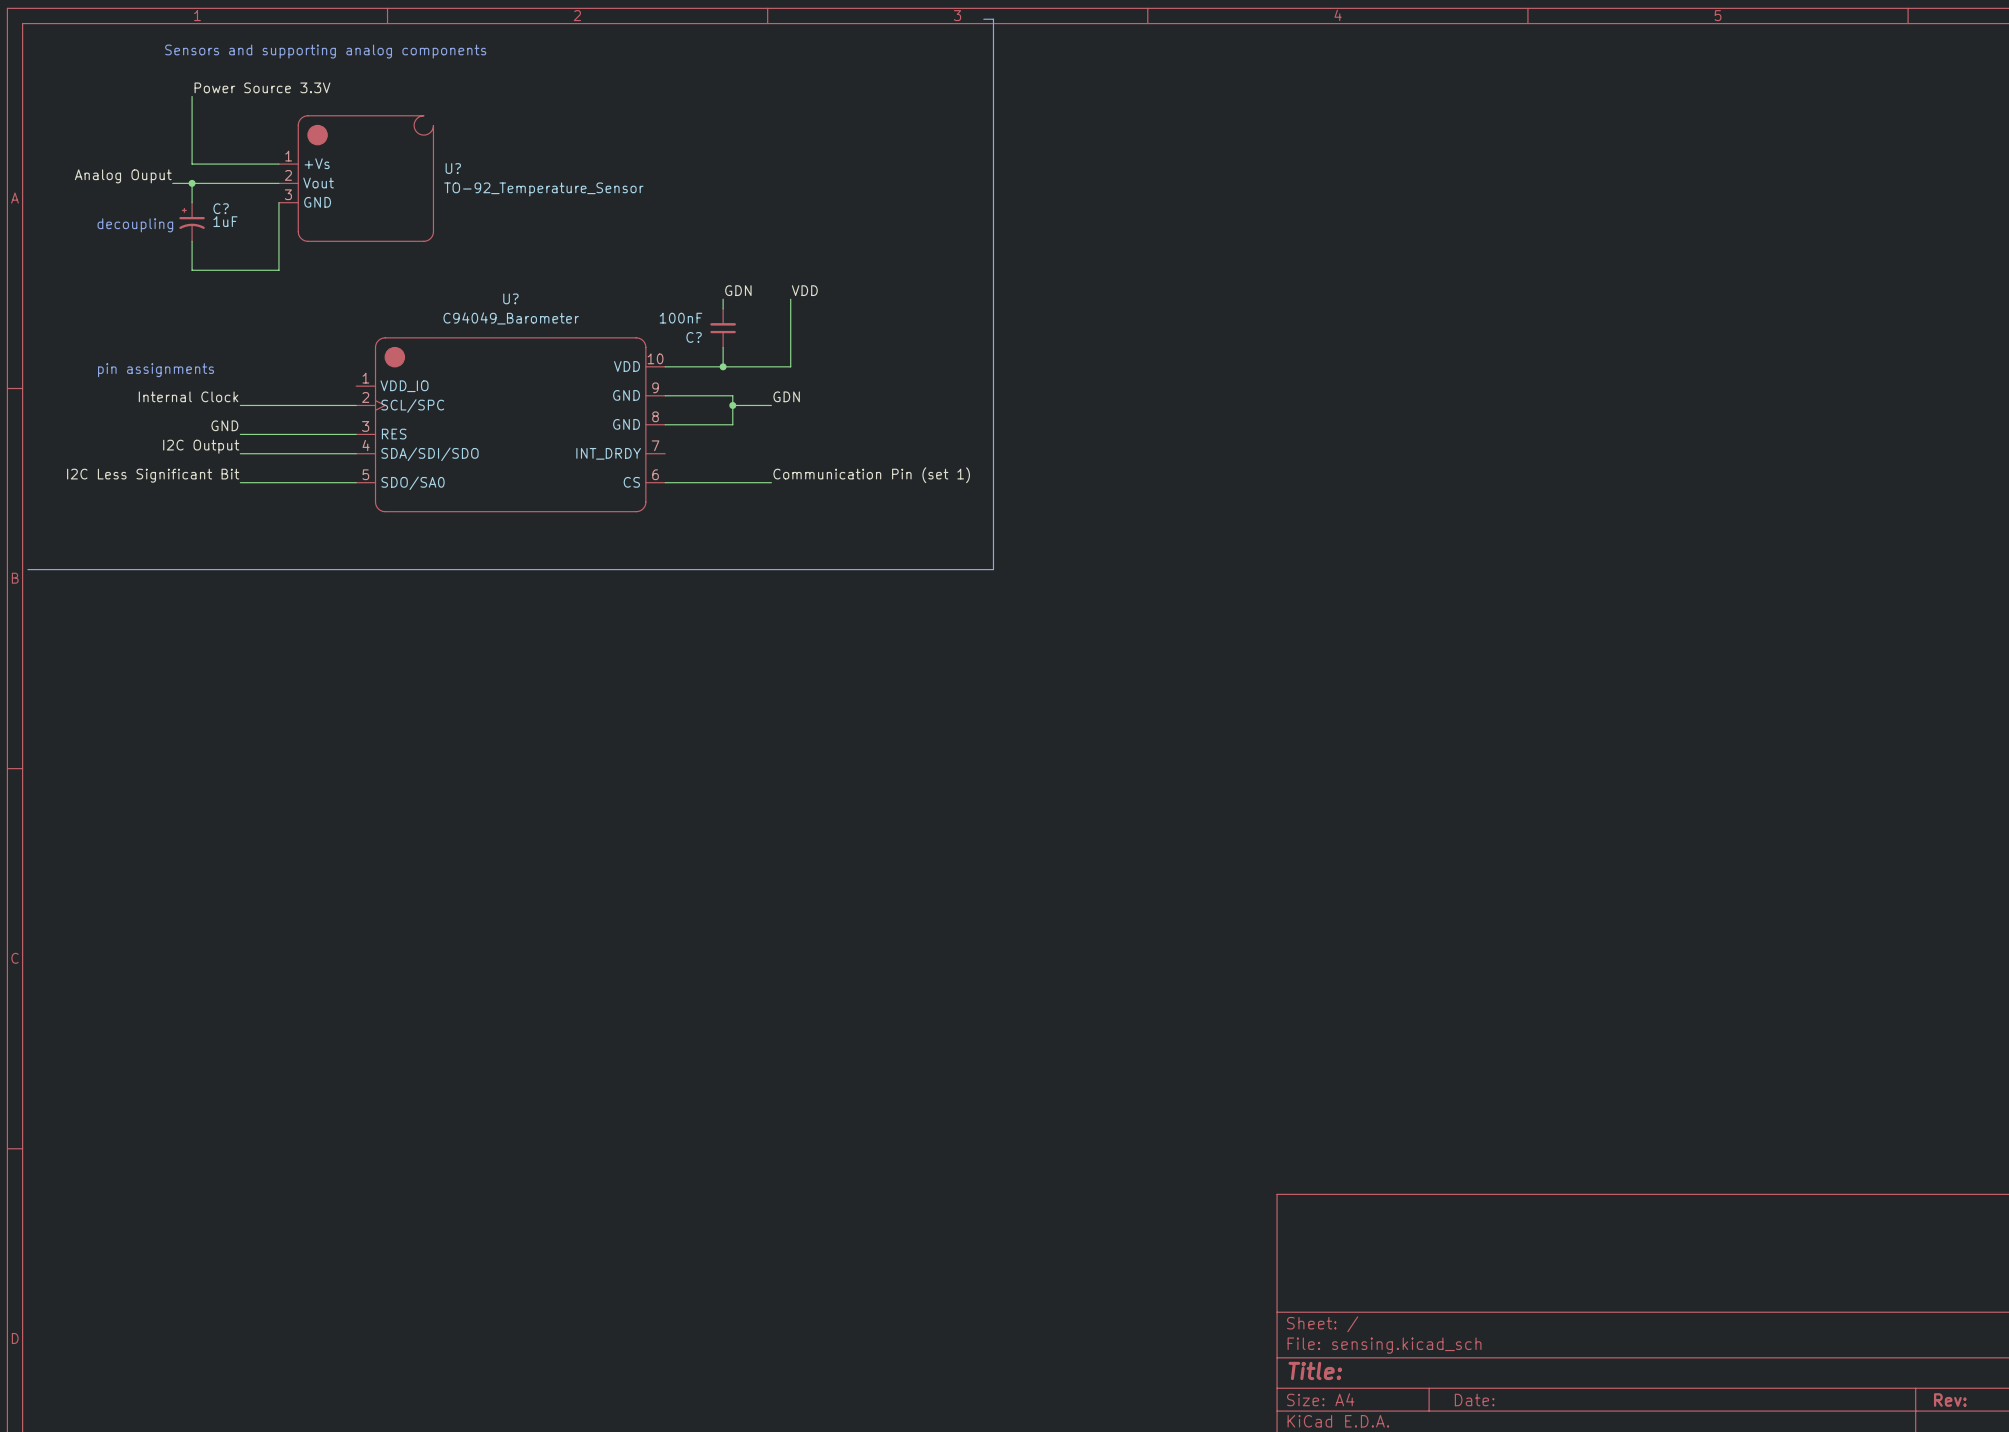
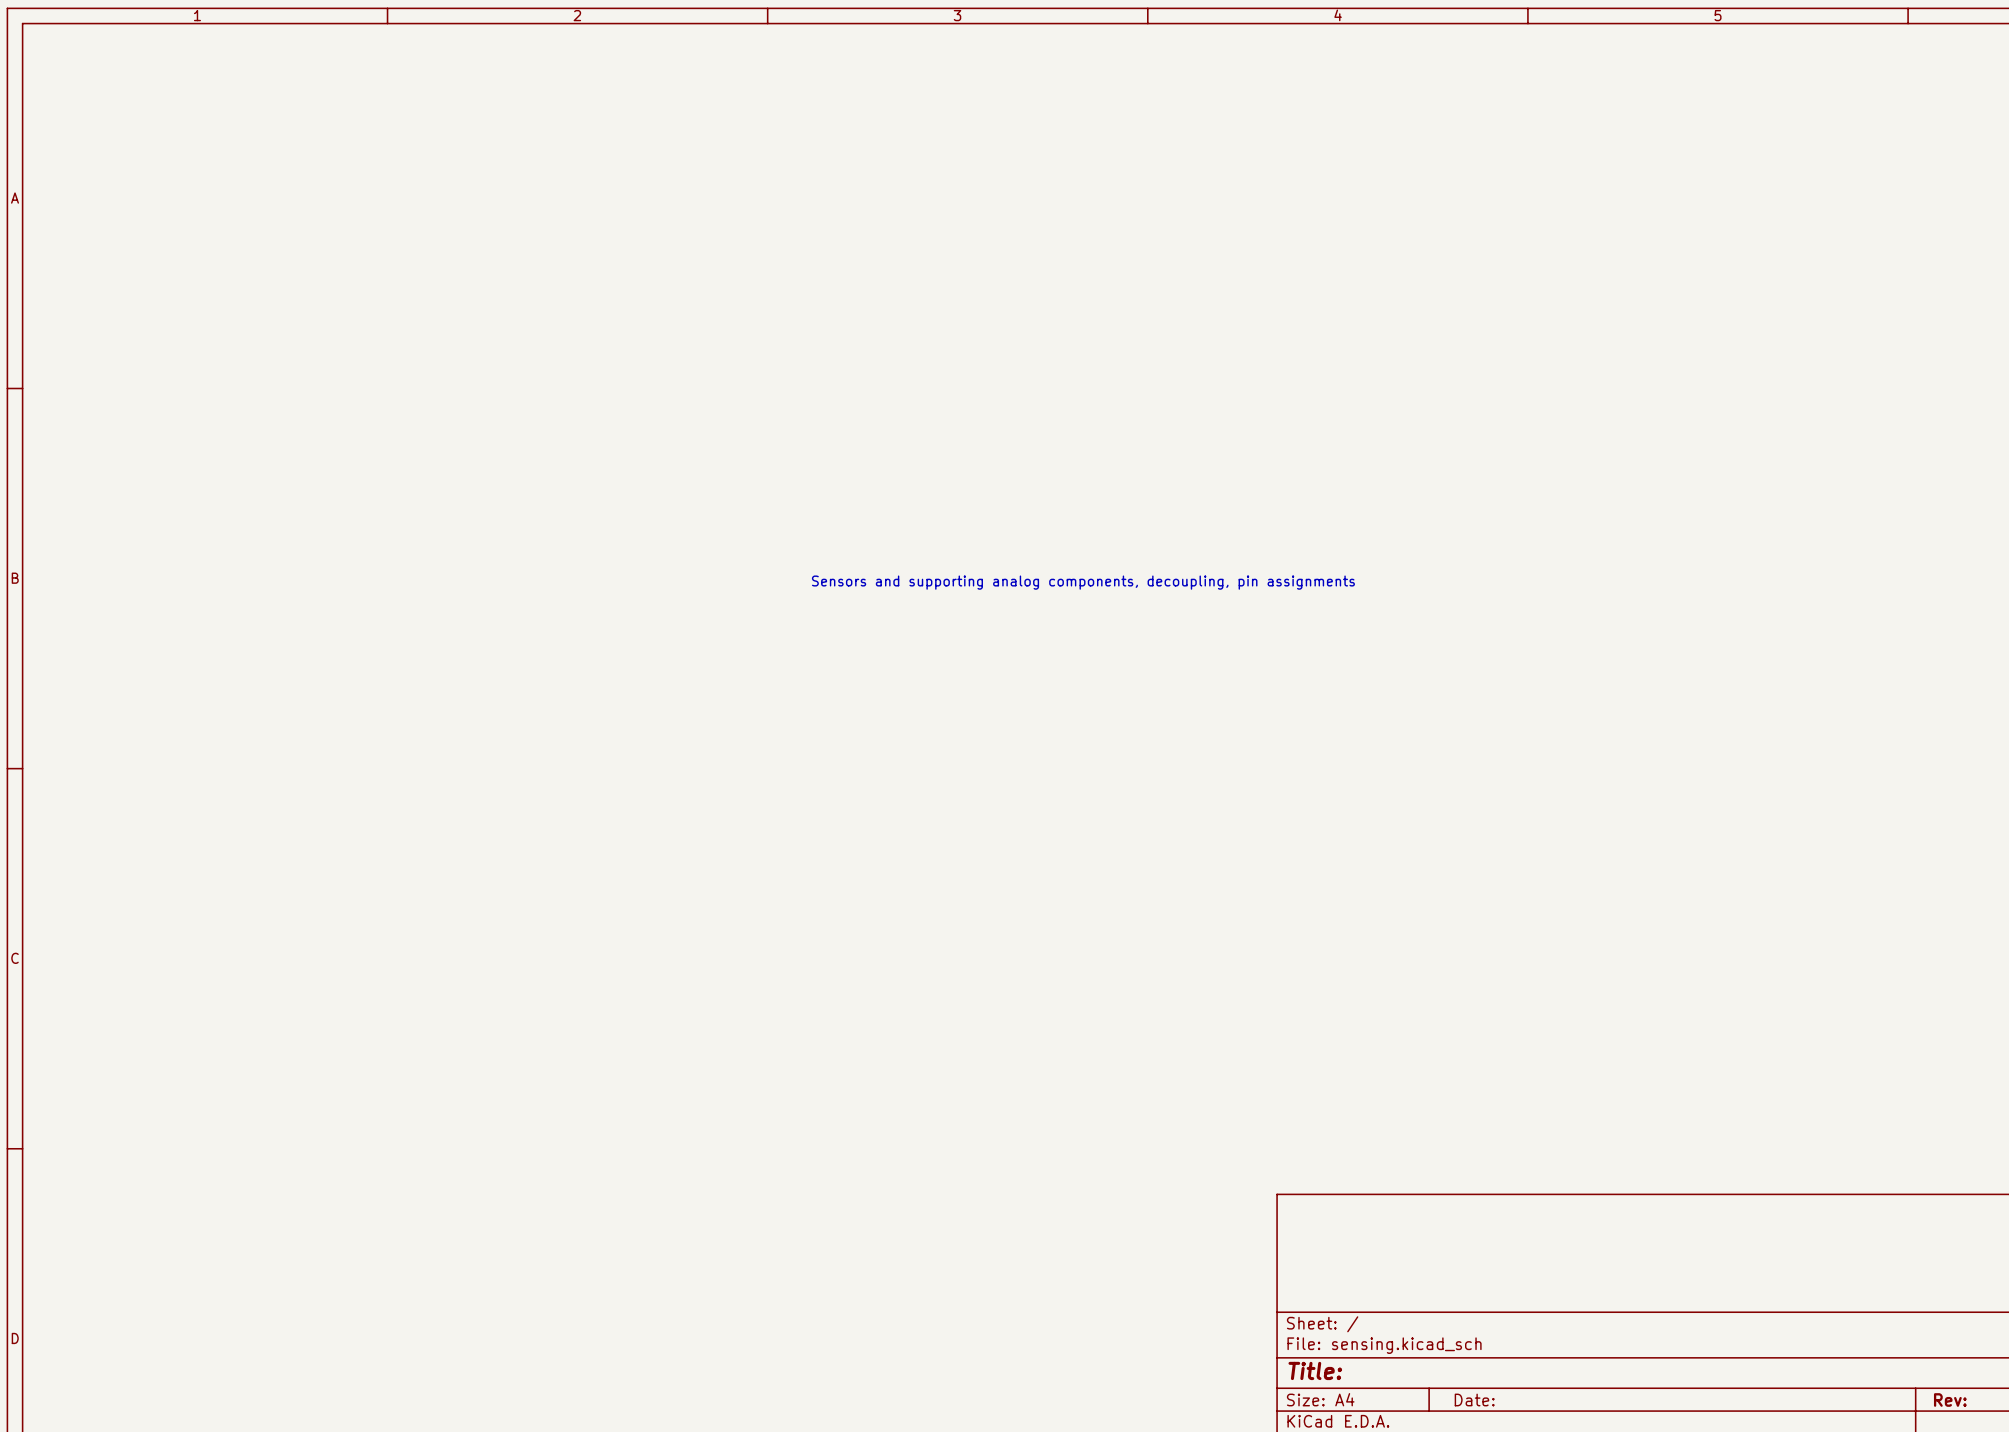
line: (983, 19) (993, 19) (993, 569) (27, 569) -> none
text: Sensors and supporting analog components (325, 51) -> none
label: Power Source 3.3V (262, 87) -> none
wire: (192, 96) (192, 164) (278, 164) -> none
label: Analog Ouput (123, 176) -> none
U?: TO-92_Temperature_Sensor (356, 178) -> none
wire: (172, 183) (278, 183) -> none
wire: (192, 183) (192, 202) -> none
junction: (192, 183) -> none
wire: (278, 202) (278, 270) (192, 270) (192, 241) -> none
C?: 1uF (192, 222) -> none
text: decoupling (135, 225) -> none
label: GDN (738, 290) -> none
label: VDD (804, 290) -> none
wire: (723, 299) (723, 308) -> none
wire: (790, 299) (790, 366) (665, 366) -> none
C?: 100nF (723, 328) -> none
wire: (723, 347) (723, 366) -> none
junction: (723, 366) -> none
text: pin assignments (156, 370) -> none
wire: (665, 395) (732, 395) (732, 424) (665, 424) -> none
label: Internal Clock (188, 396) -> none
label: GDN (786, 396) -> none
wire: (240, 405) (356, 405) -> none
wire: (732, 405) (771, 405) -> none
junction: (732, 405) -> none
U?: C94049_Barometer (510, 424) -> none
label: GND (224, 425) -> none
wire: (240, 434) (356, 434) -> none
label: I2C Output (201, 446) -> none
wire: (240, 453) (356, 453) -> none
label: I2C Less Significant Bit (153, 475) -> none
label: Communication Pin (set 1) (871, 475) -> none
wire: (240, 482) (356, 482) -> none
wire: (665, 482) (771, 482) -> none
text: none -> Sensors and supporting analog components, decoupling, pin assignments (1083, 582)

